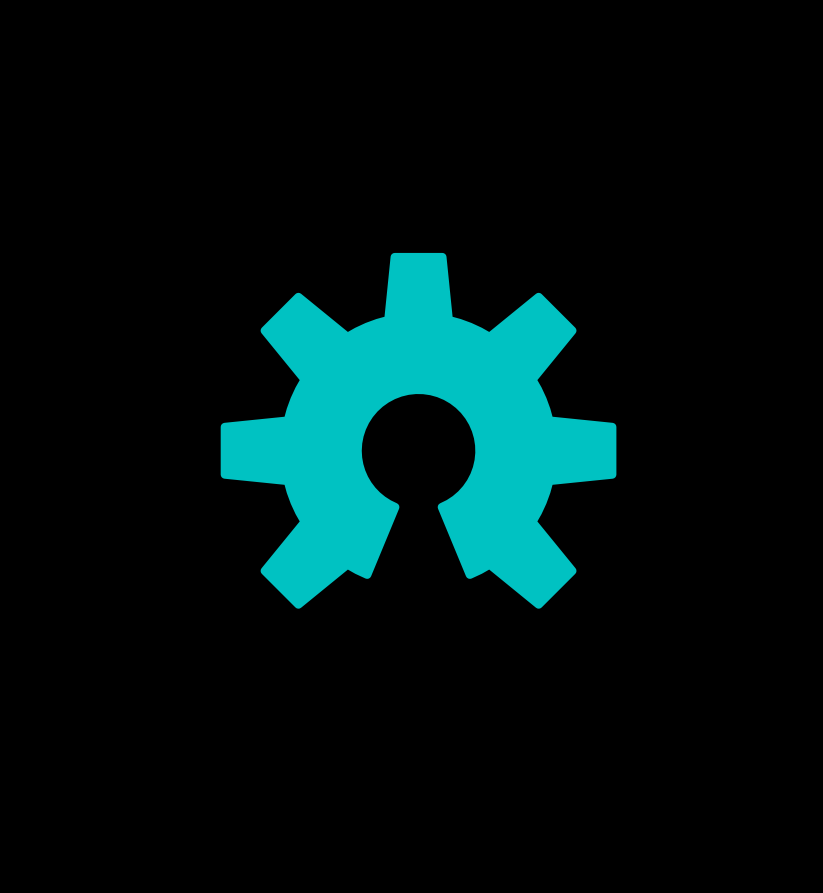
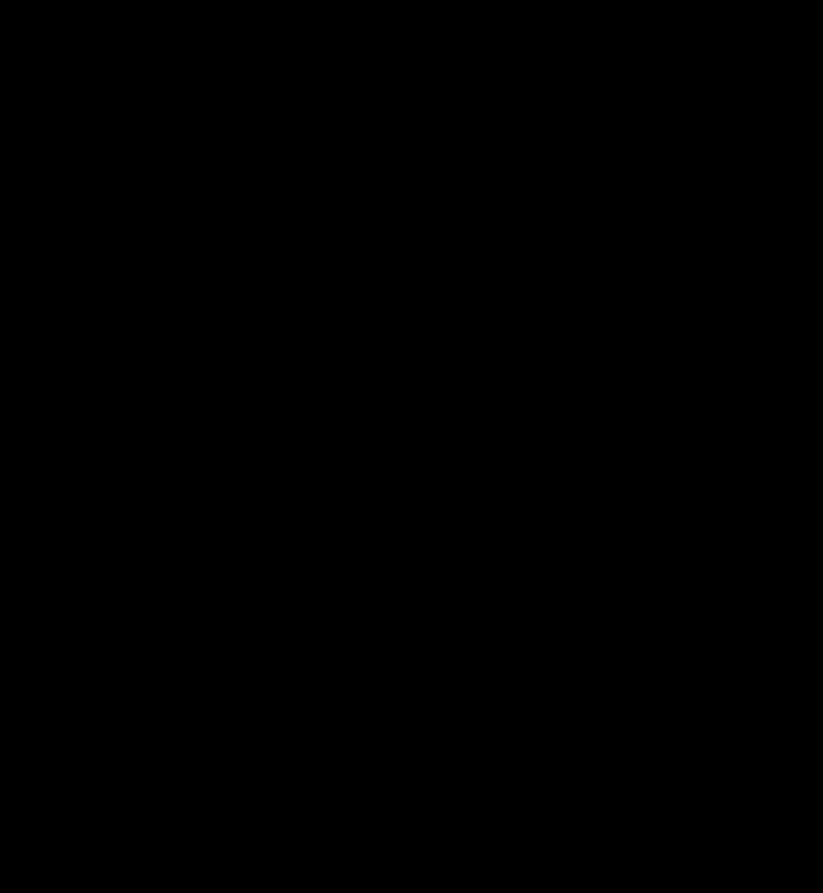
drawing: [220, 252, 617, 609] -> none

